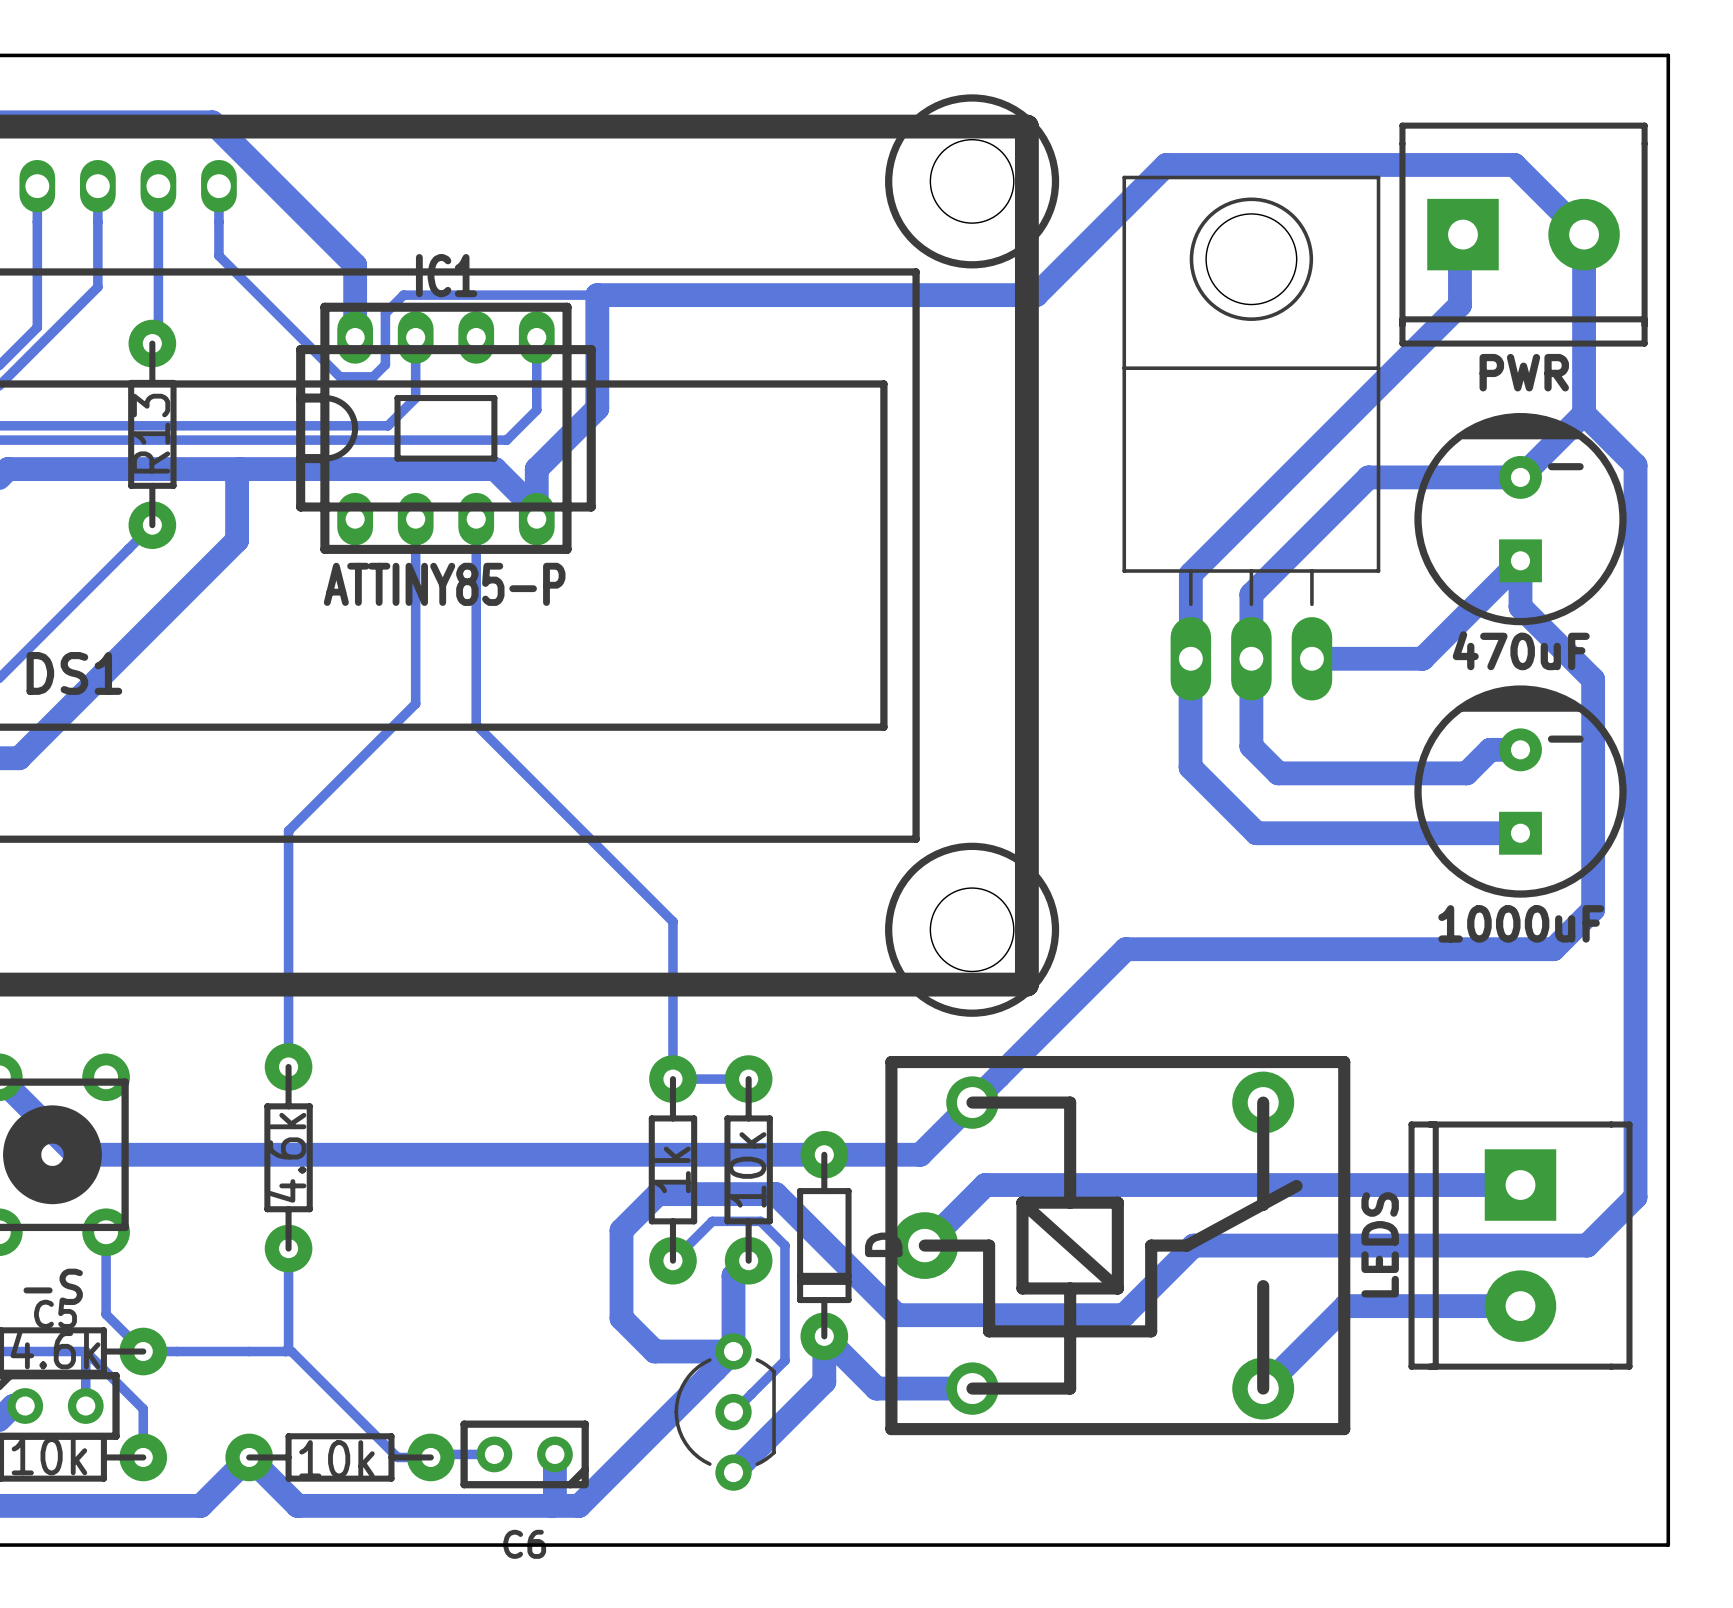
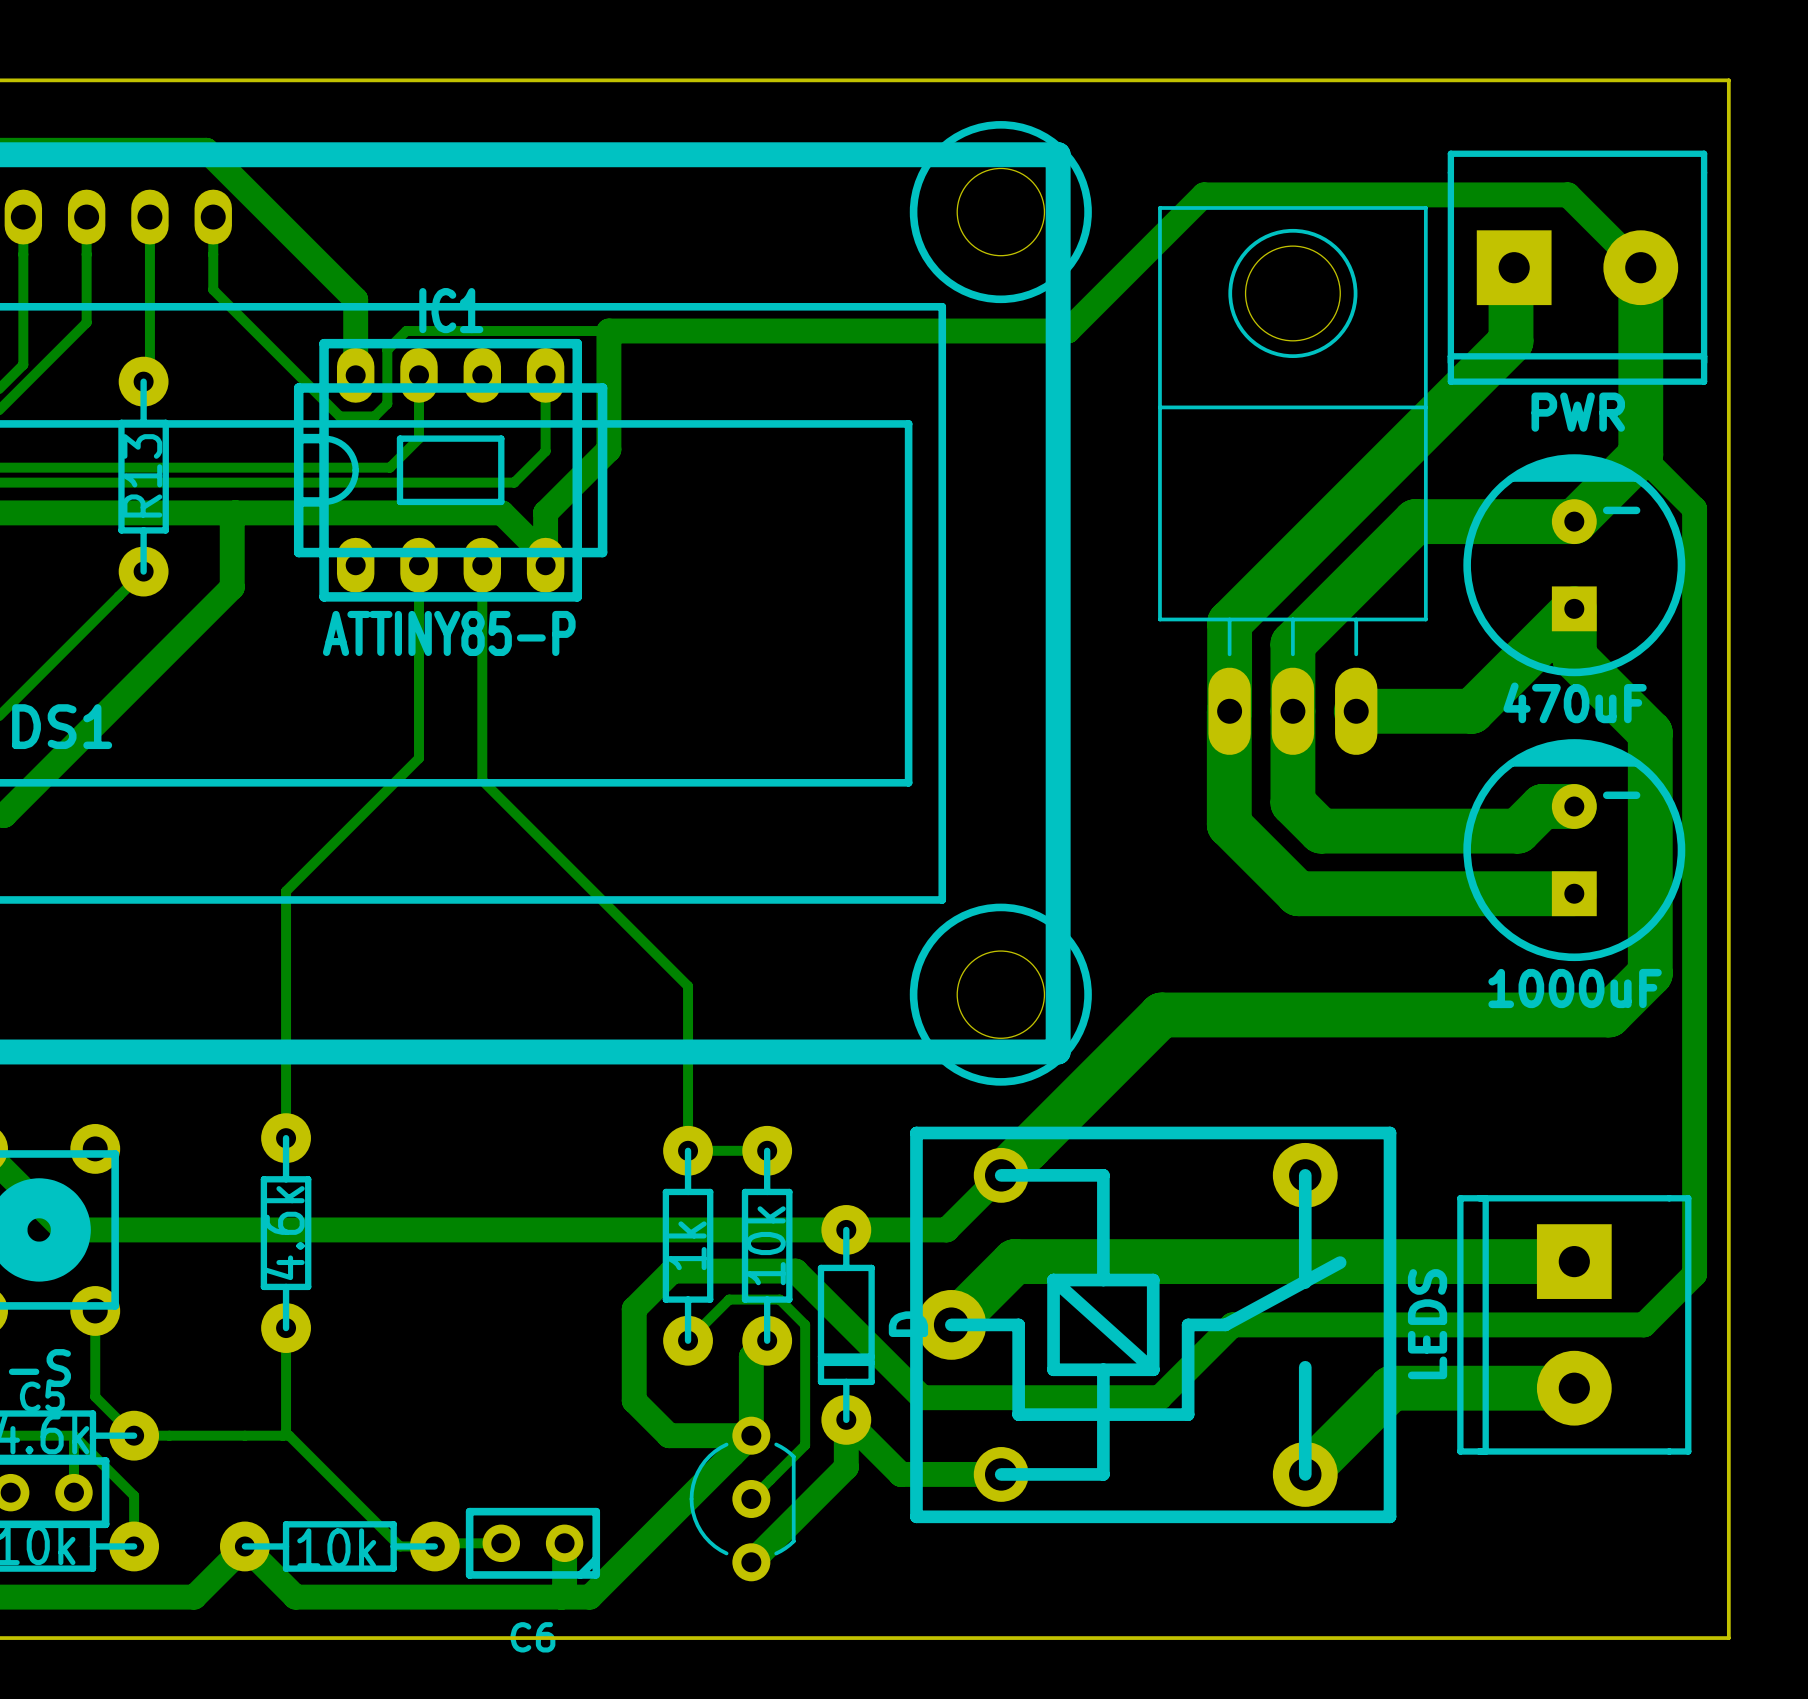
bottom track width: thin (1462, 234) (1459, 237) (1459, 305) (1190, 574) (1190, 658) -> thick (1514, 267) (1511, 270) (1511, 341) (1229, 622) (1229, 711)
bottom track width: thin (1584, 234) (1584, 413) (1520, 477) (1368, 477) (1251, 594) (1251, 746) (1278, 773) (1466, 773) (1490, 749) (1520, 749) -> thick (1640, 267) (1640, 455) (1574, 521) (1415, 521) (1292, 644) (1292, 802) (1321, 831) (1517, 831) (1542, 806) (1574, 806)
bottom track width: thin (1311, 658) (1422, 658) (1520, 560) (1520, 606) (1593, 679) (1593, 909) (1553, 949) (1125, 949) (972, 1102) -> thick (1356, 711) (1471, 711) (1574, 608) (1574, 657) (1650, 732) (1650, 973) (1608, 1014) (1161, 1014) (1001, 1175)
bottom track width: thin (1190, 659) (1190, 767) (1256, 833) (1520, 833) -> thick (1229, 711) (1229, 824) (1298, 893) (1574, 893)
bottom track width: thin (1520, 1185) (985, 1185) (924, 1245) -> thick (1574, 1261) (1014, 1261) (951, 1324)
bottom track width: thin (1520, 1306) (1345, 1306) (1263, 1388) -> thick (1574, 1388) (1391, 1388) (1305, 1474)

